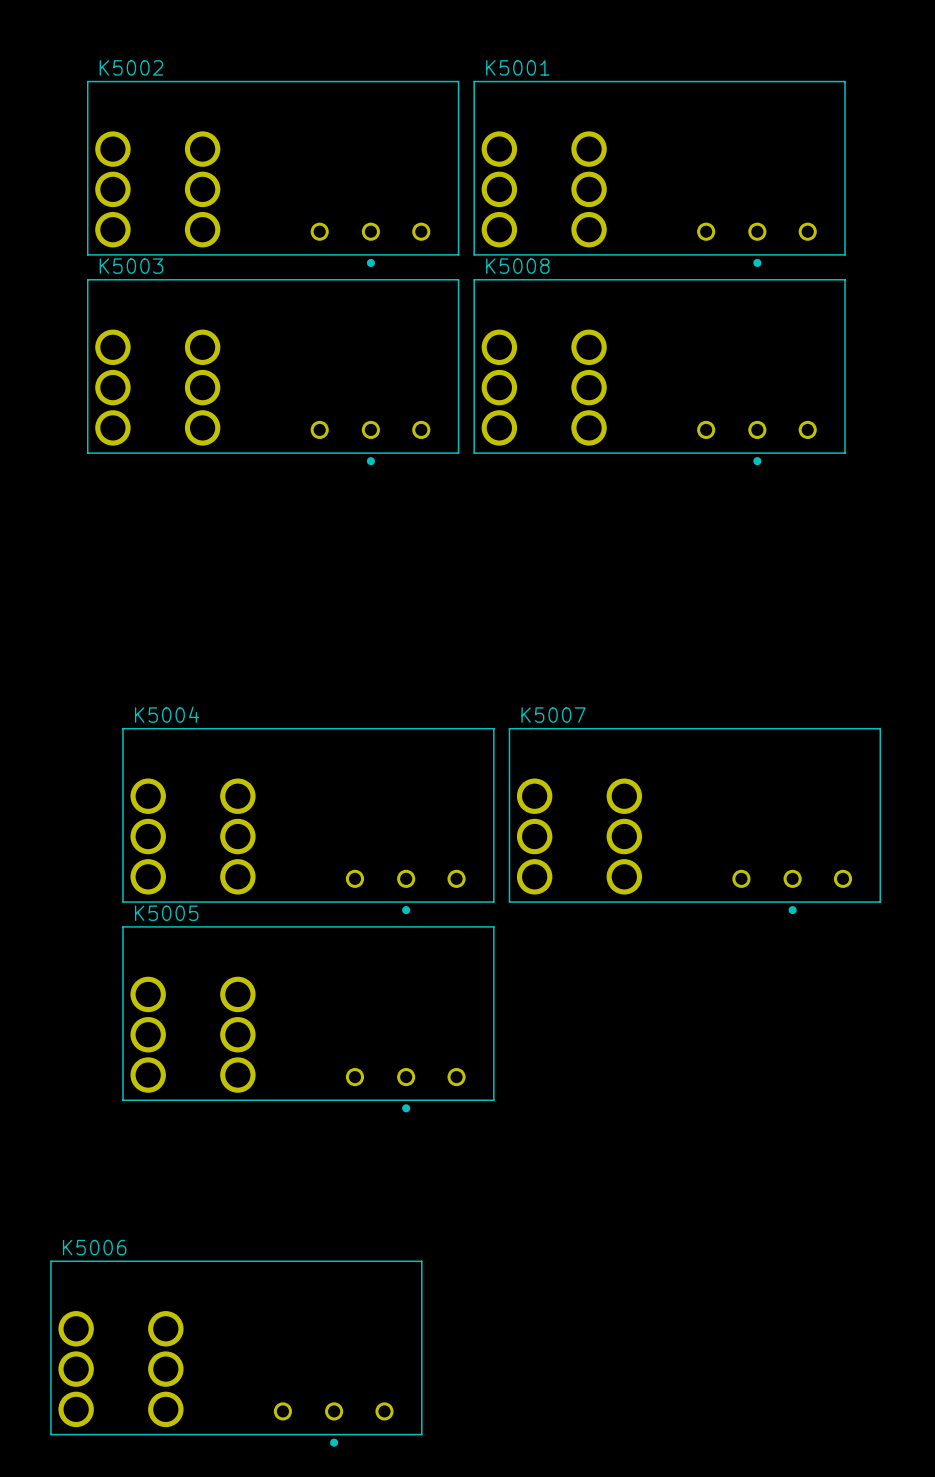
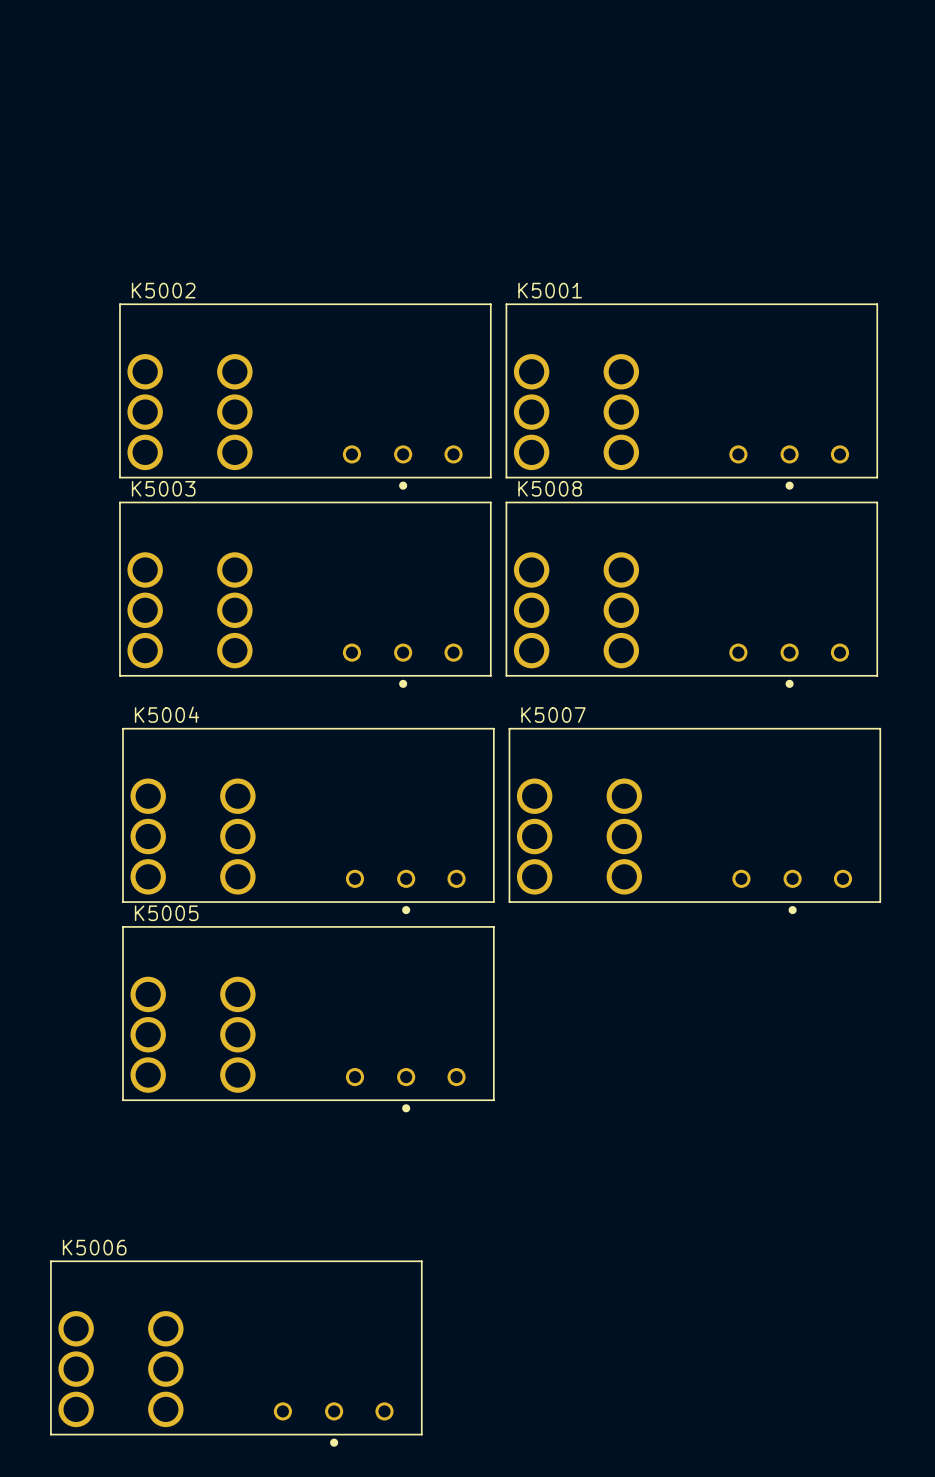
K5002 position: (273, 173) -> (305, 396)
K5001 position: (659, 173) -> (691, 396)
K5003 position: (273, 372) -> (305, 594)
K5008 position: (659, 372) -> (691, 594)

